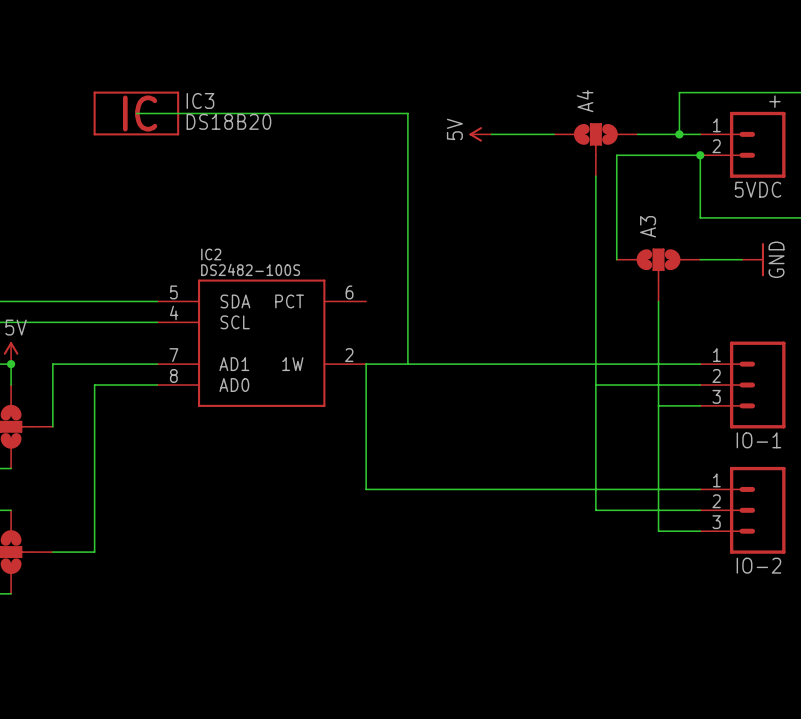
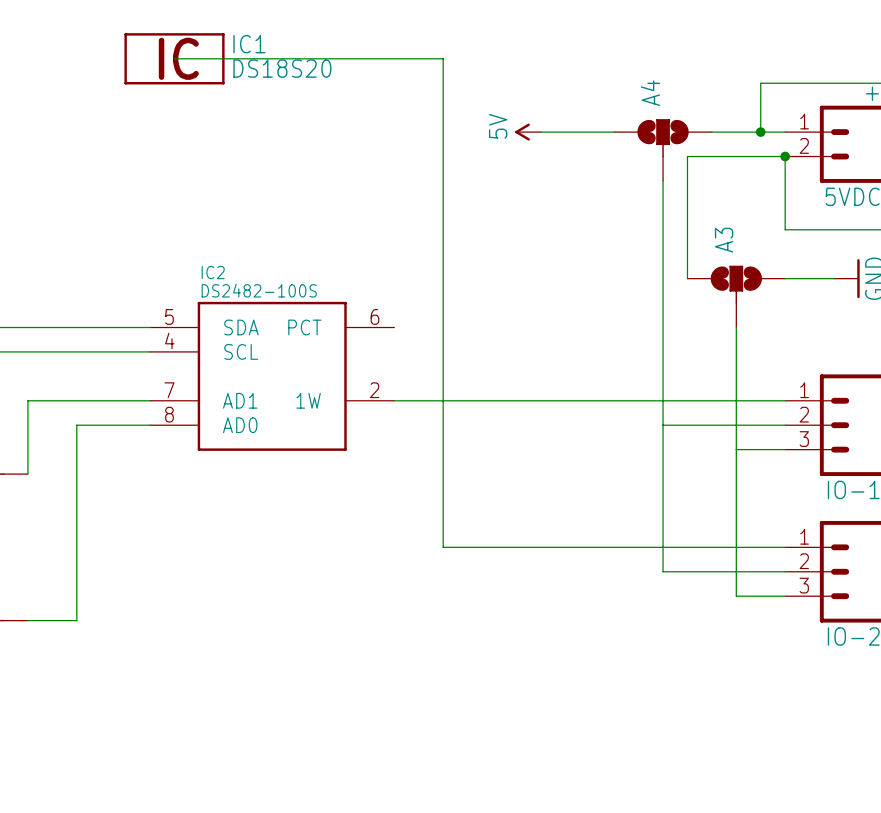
IC1: none -> DS18S20 (174, 58)
wire: (136, 113) (407, 113) -> (174, 58) (443, 58) (443, 107)
IC3: DS18B20 (136, 113) -> none
wire: (366, 364) (366, 489) (407, 489) -> (443, 400) (443, 547)

